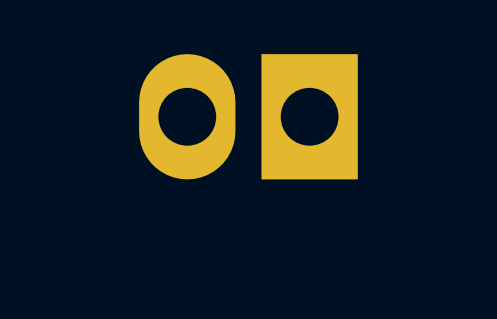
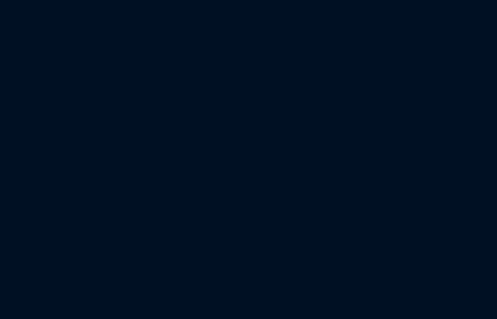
part: (248, 116) -> none

